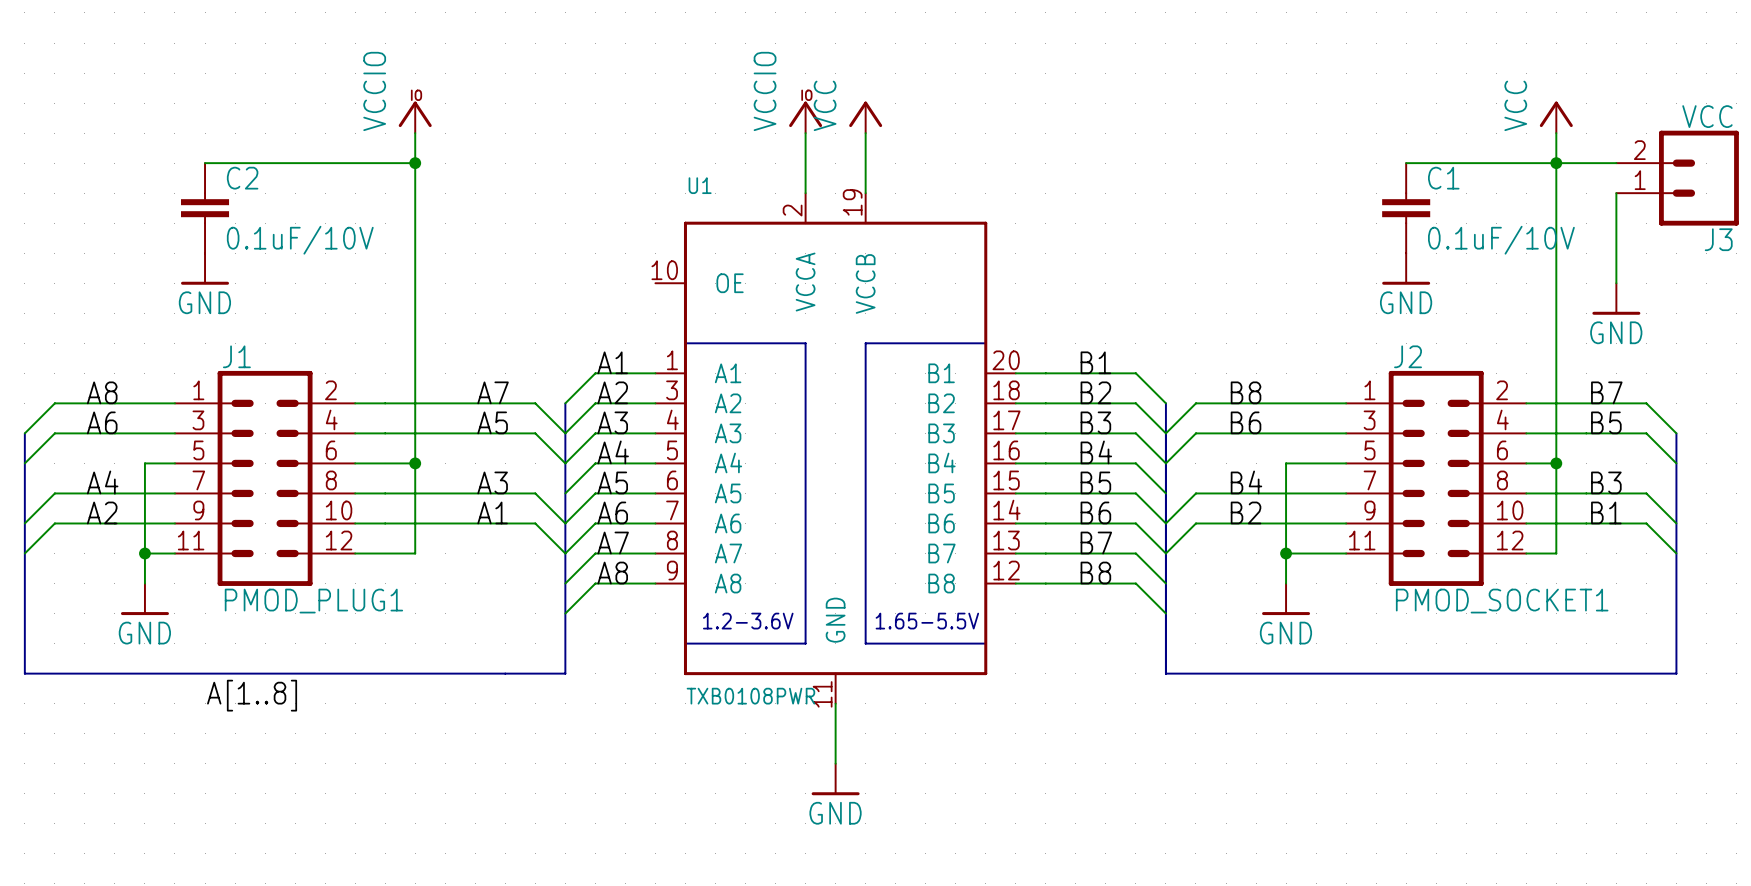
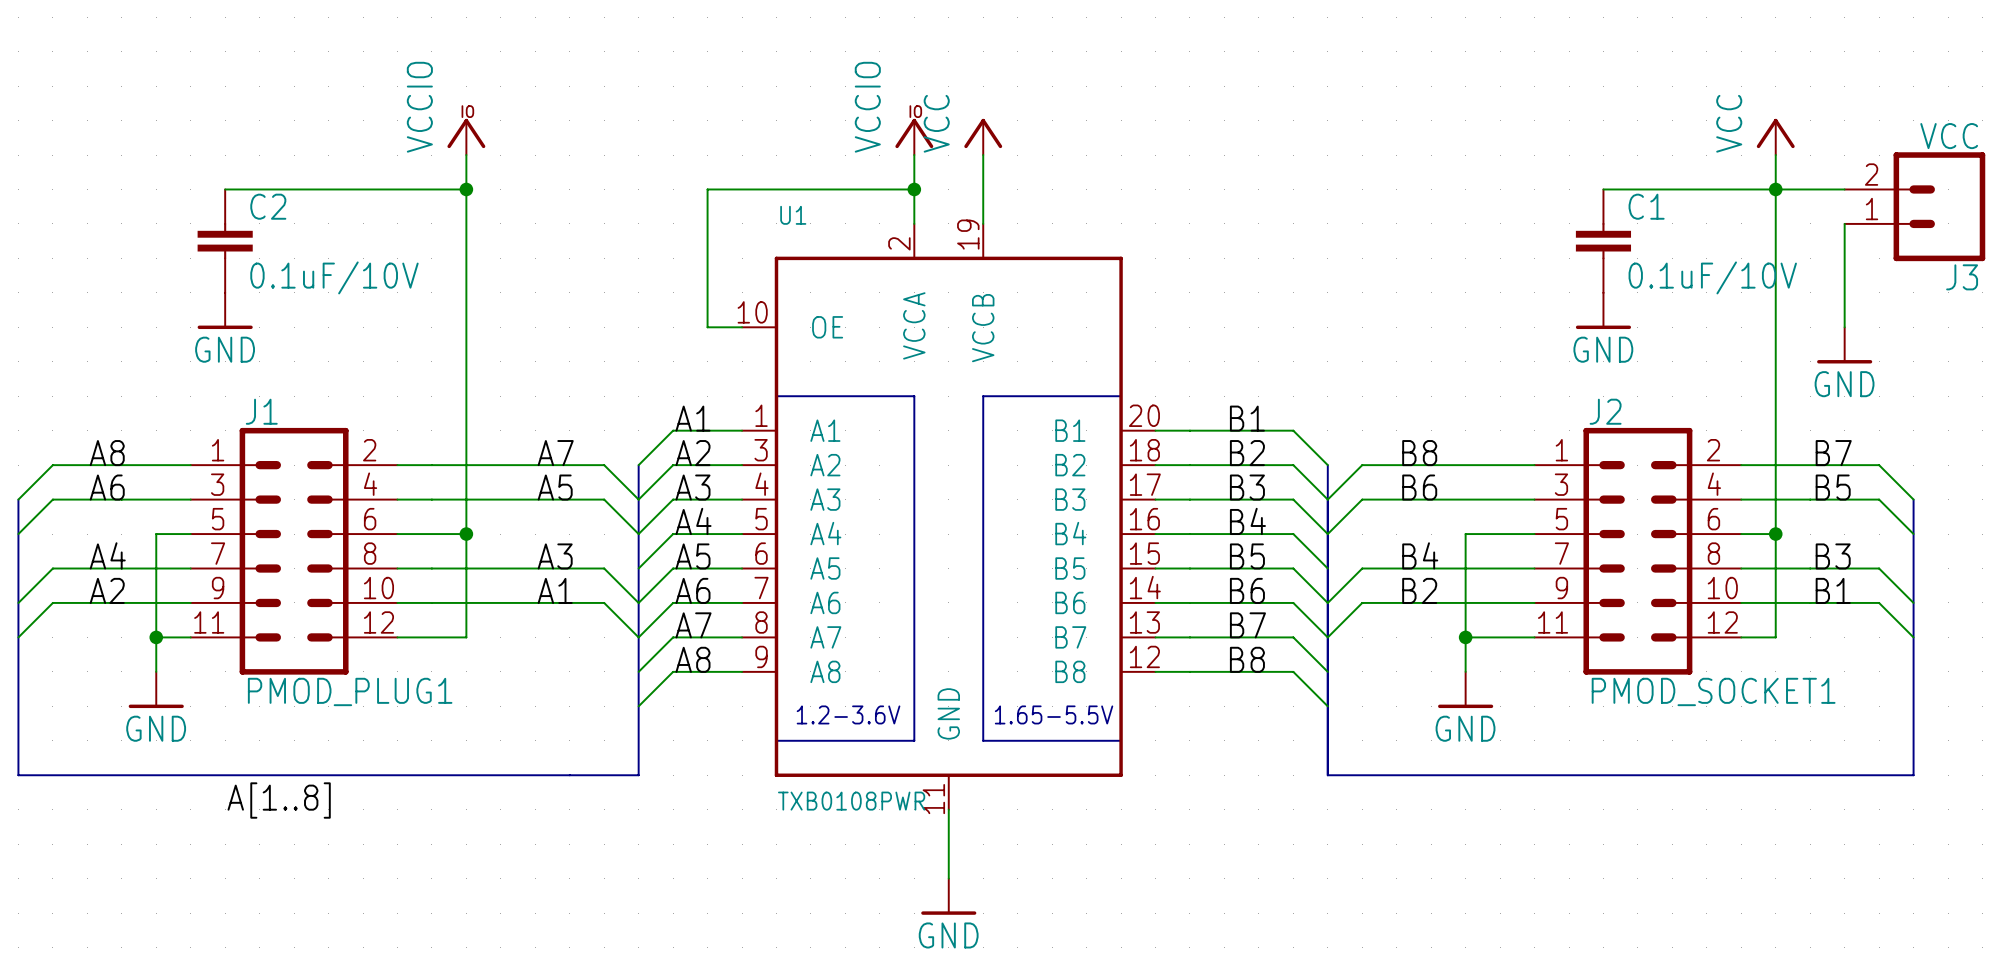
wire: none -> (914, 189) (707, 189) (707, 327) (742, 327)
junction: none -> (914, 189)

